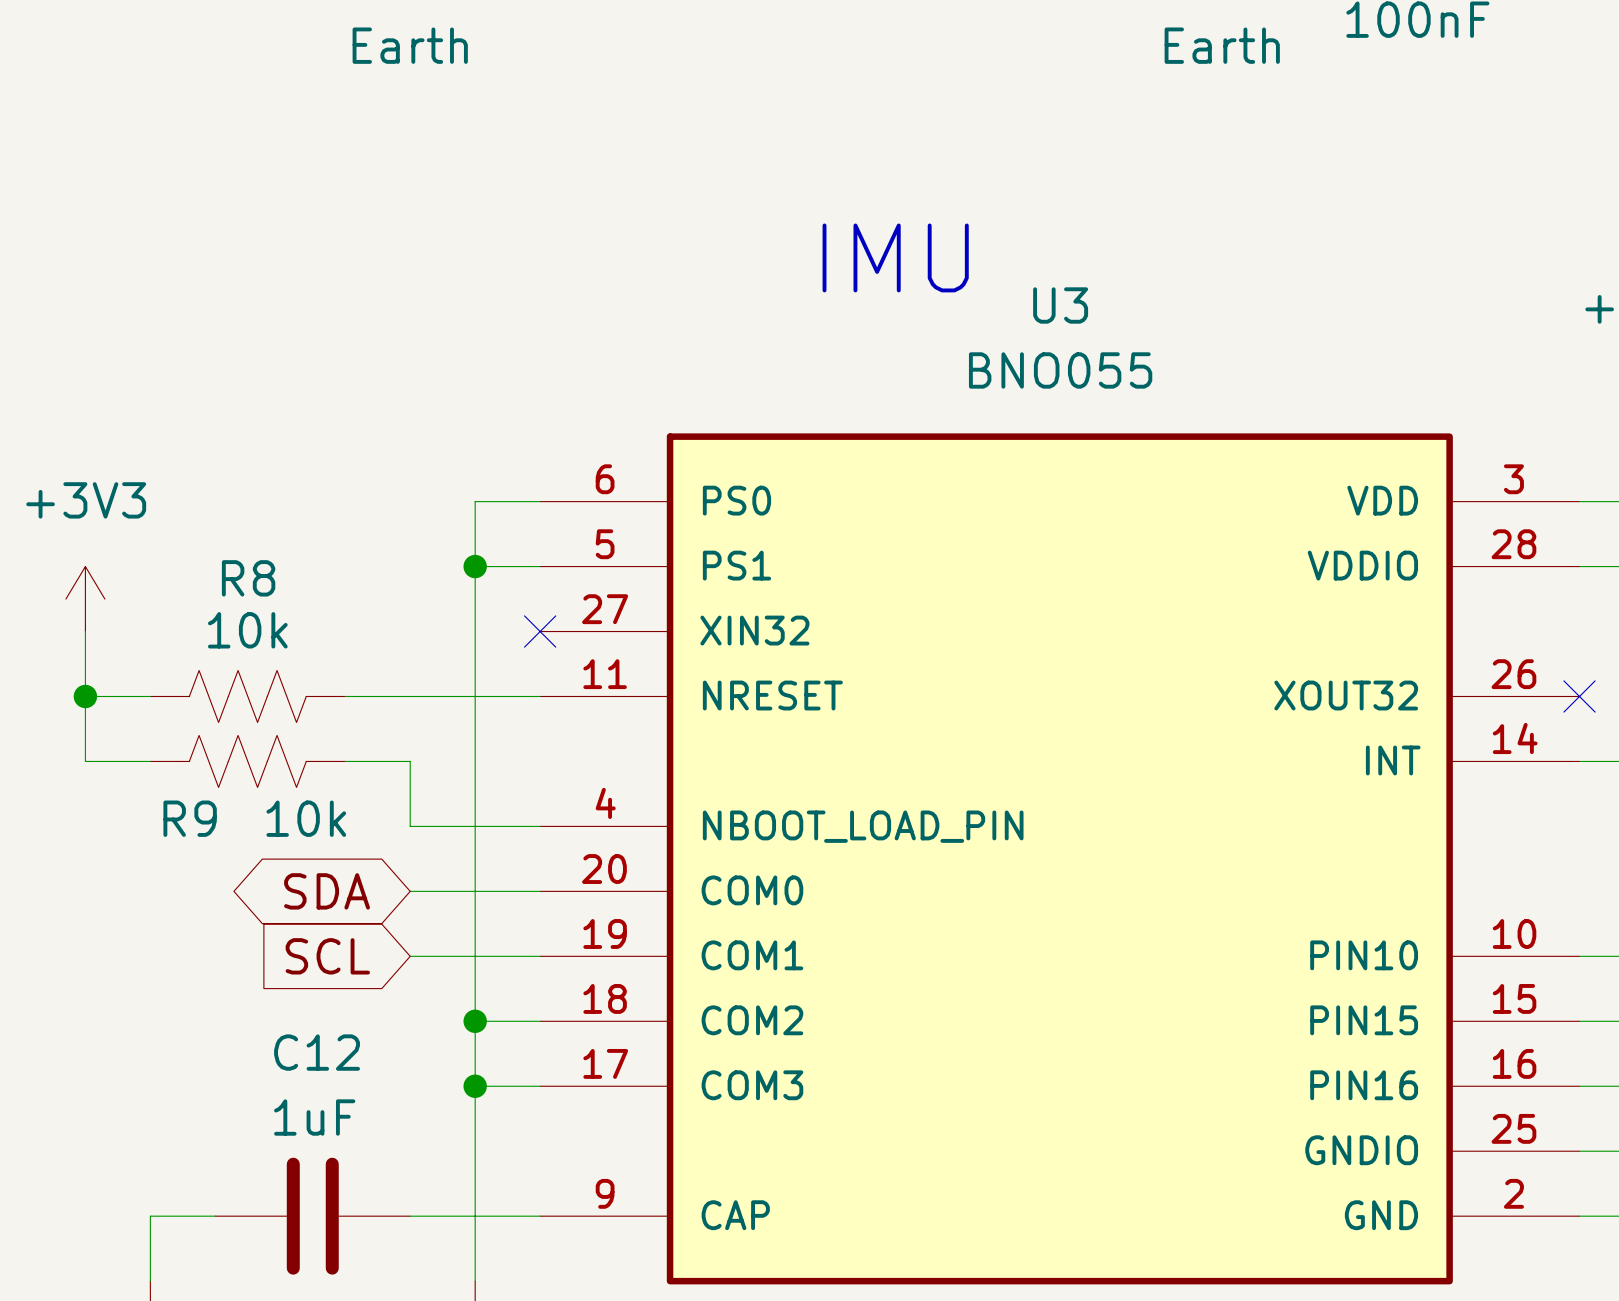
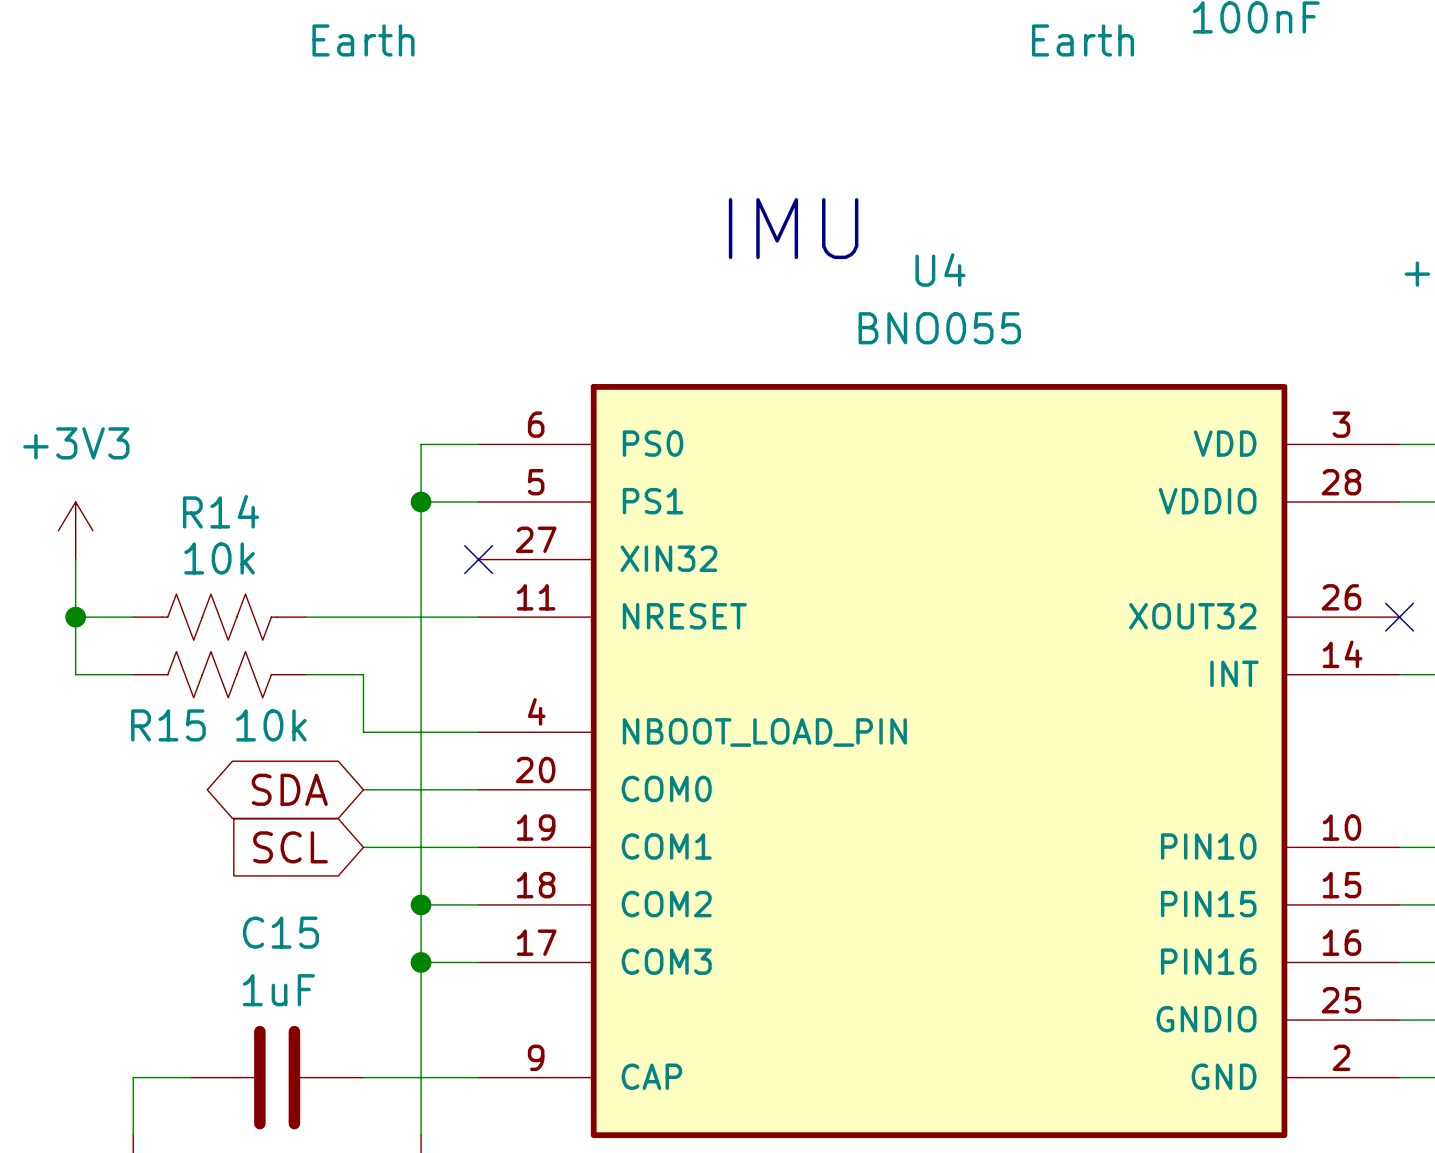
U3 name: U3 (1060, 305) -> U4 (940, 270)
R8 name: R8 (248, 578) -> R14 (220, 511)
R9 name: R9 (190, 818) -> R15 (168, 725)
C12 name: C12 (317, 1052) -> C15 (280, 932)

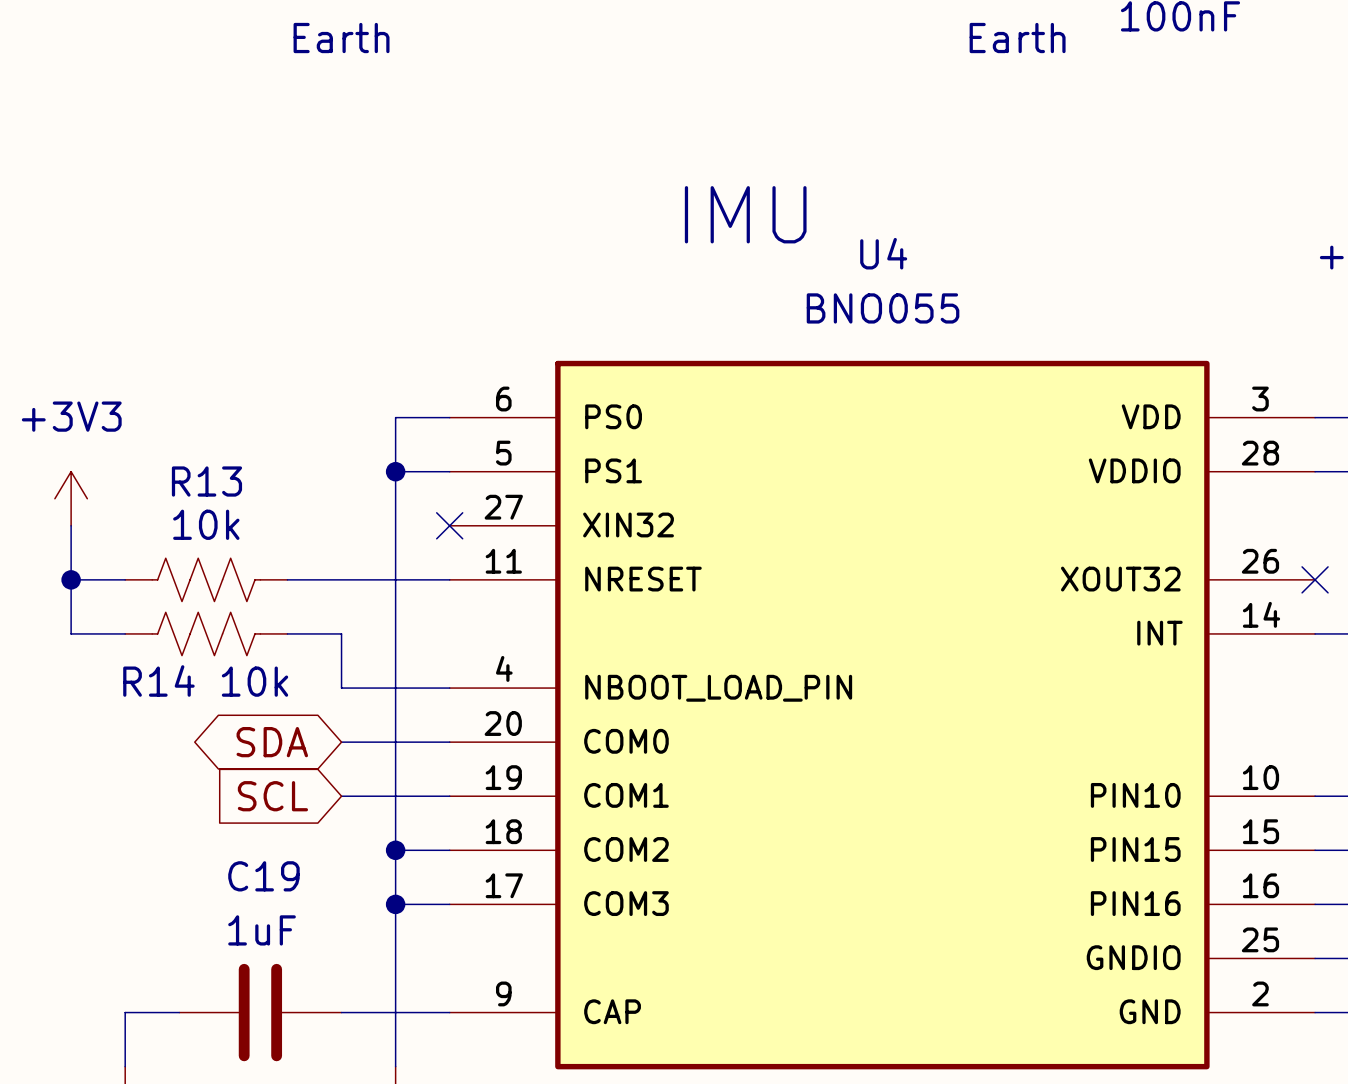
R14 name: R14 (220, 511) -> R13 (206, 481)
R15 name: R15 (168, 725) -> R14 (158, 680)
C15 name: C15 (280, 932) -> C19 (263, 876)

